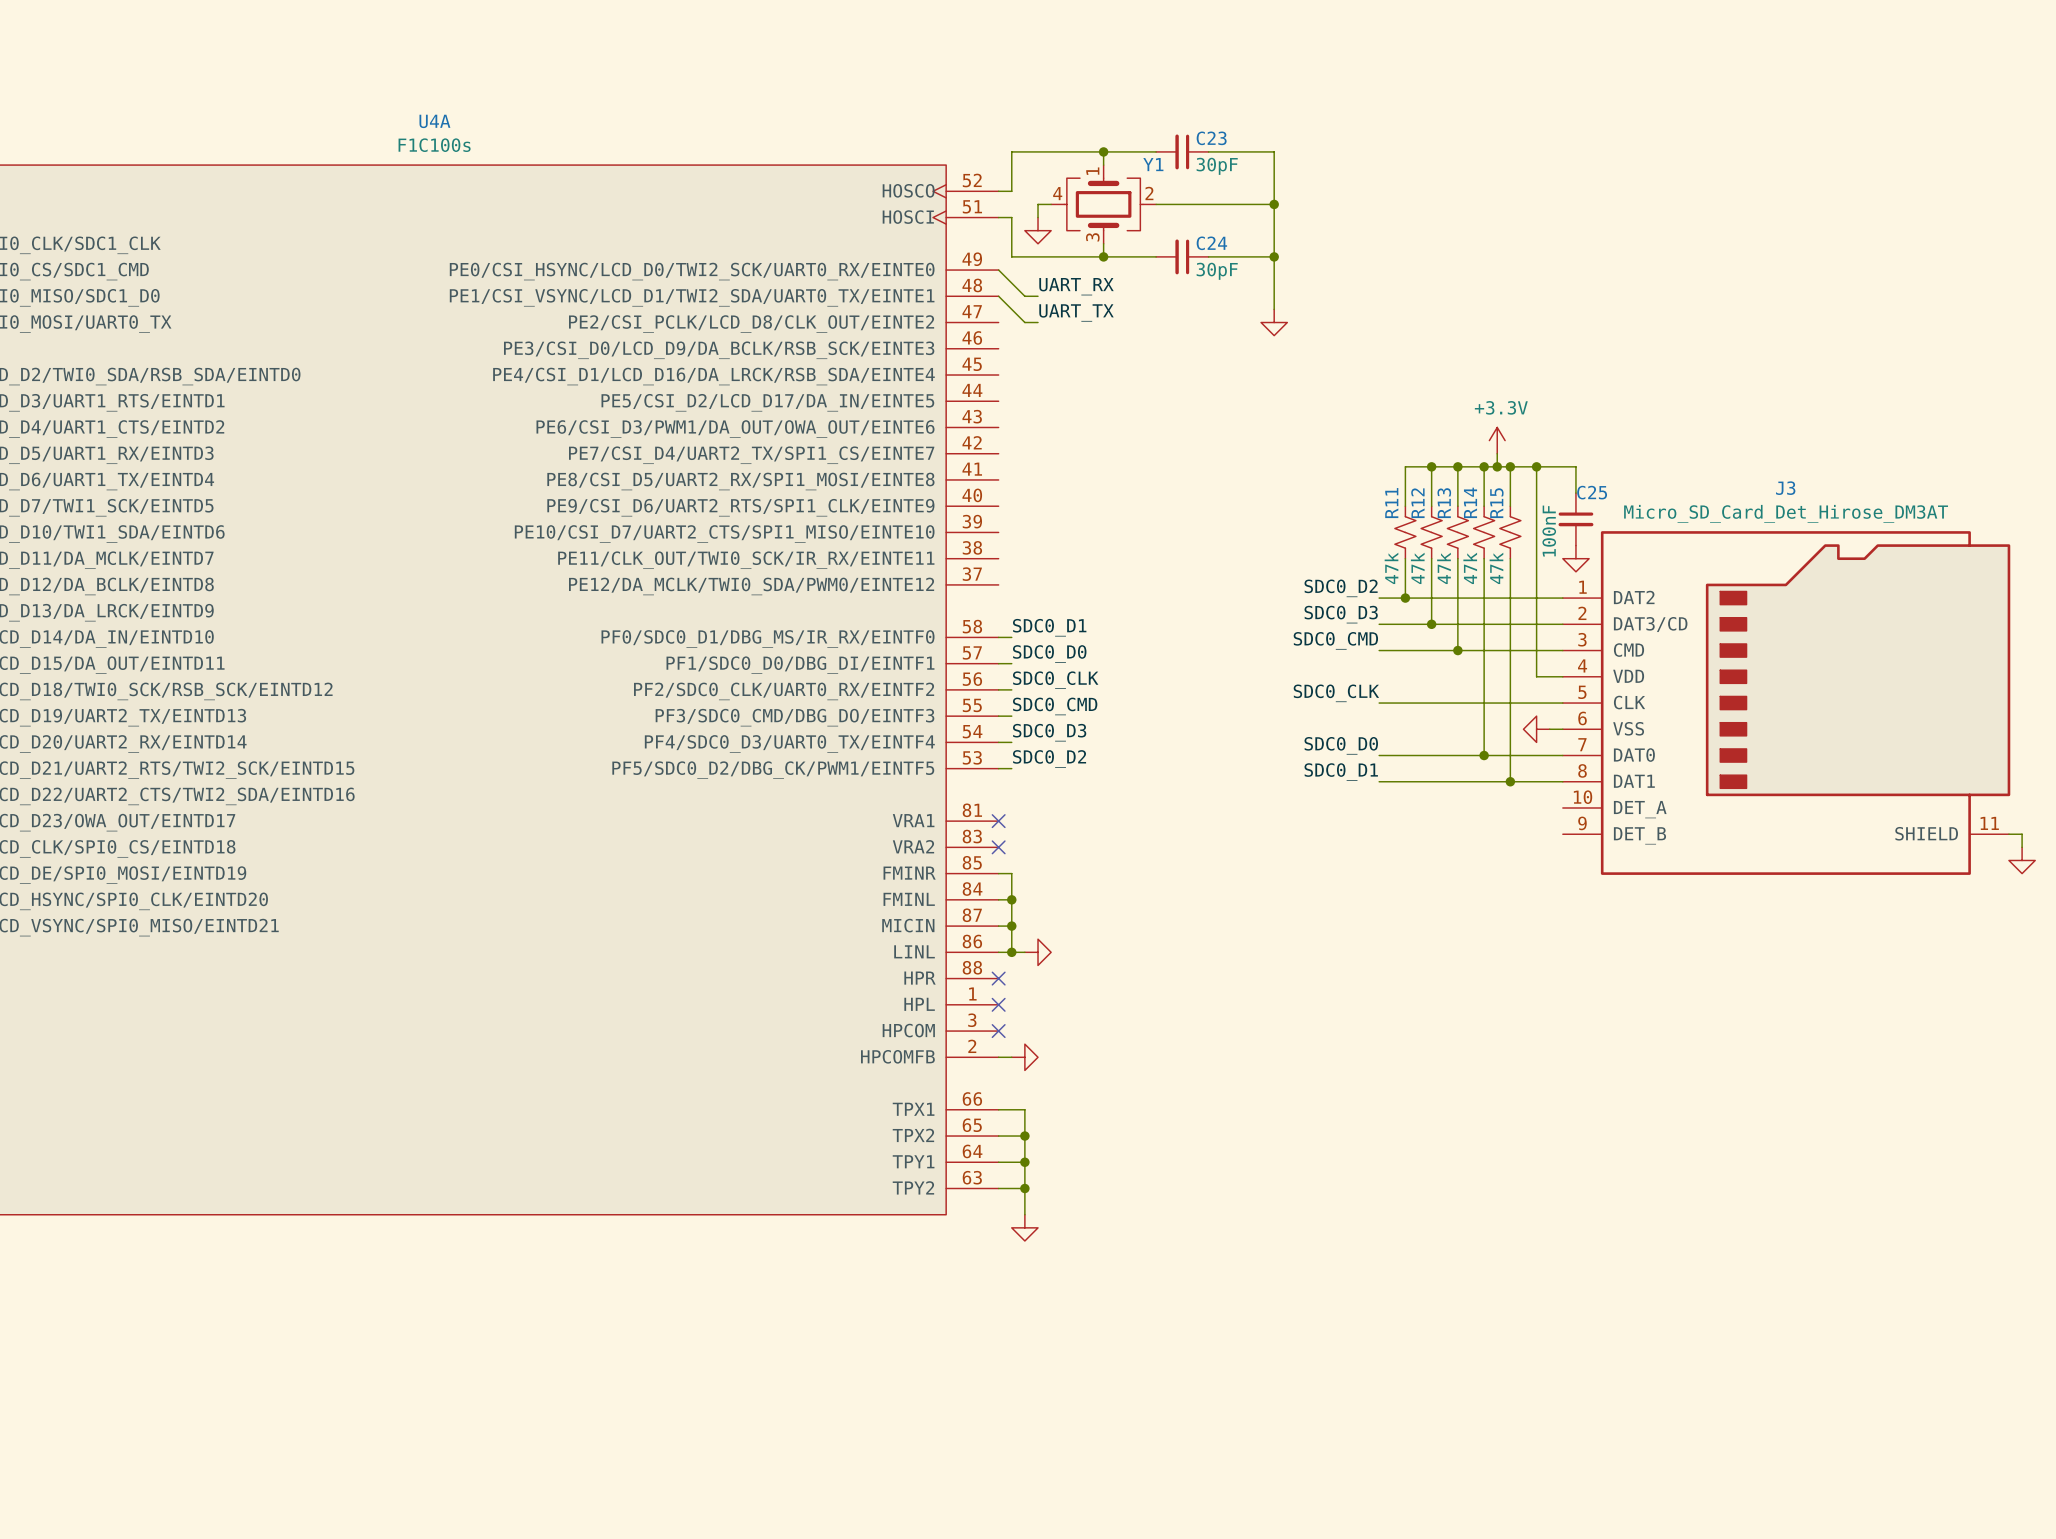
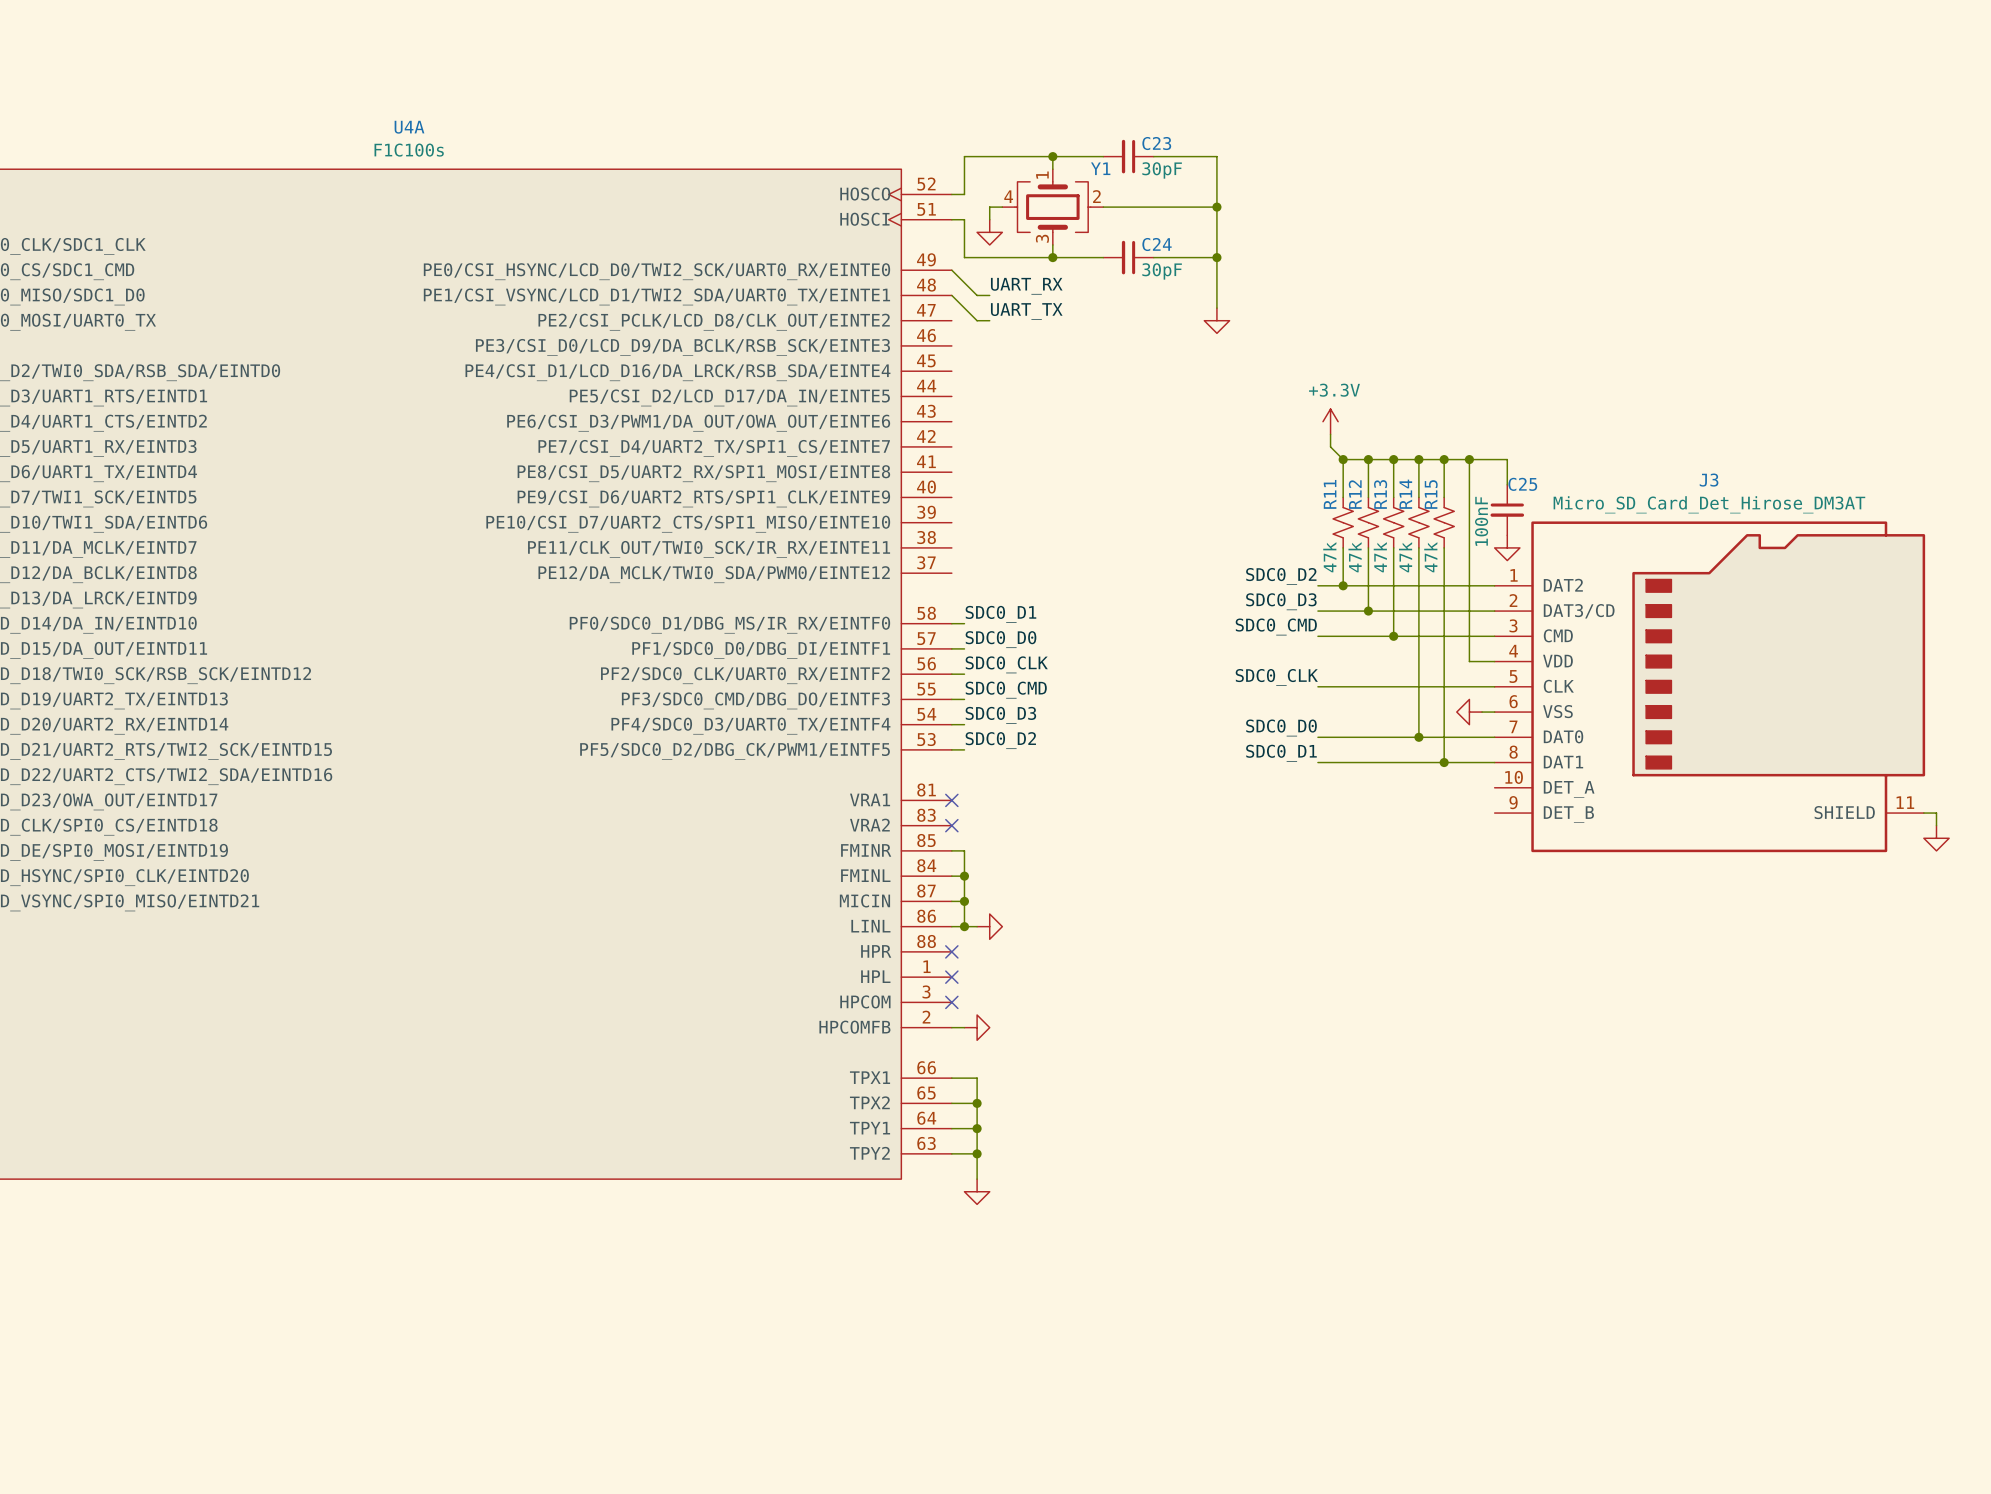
wire: none -> (1330, 434) (1330, 446) (1343, 459)
power symbol position: +3.3V (1497, 440) -> +3.3V (1330, 421)
wire: (1497, 453) (1497, 466) -> none
junction: none -> (1343, 459)
junction: (1497, 466) -> none

